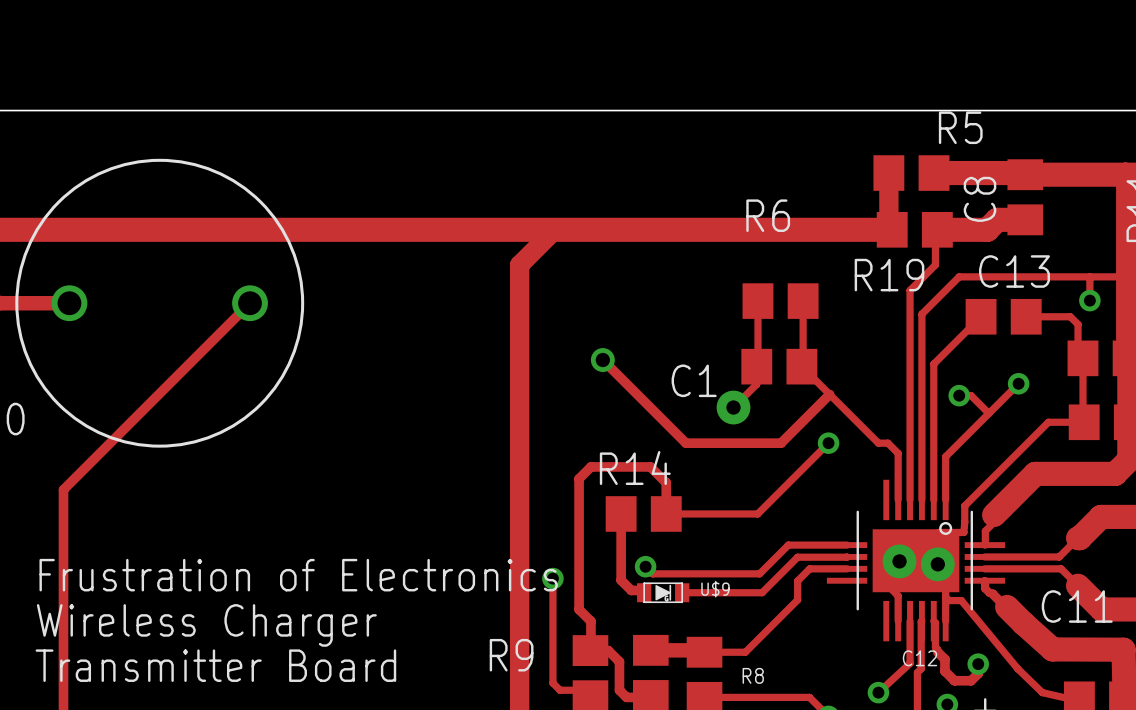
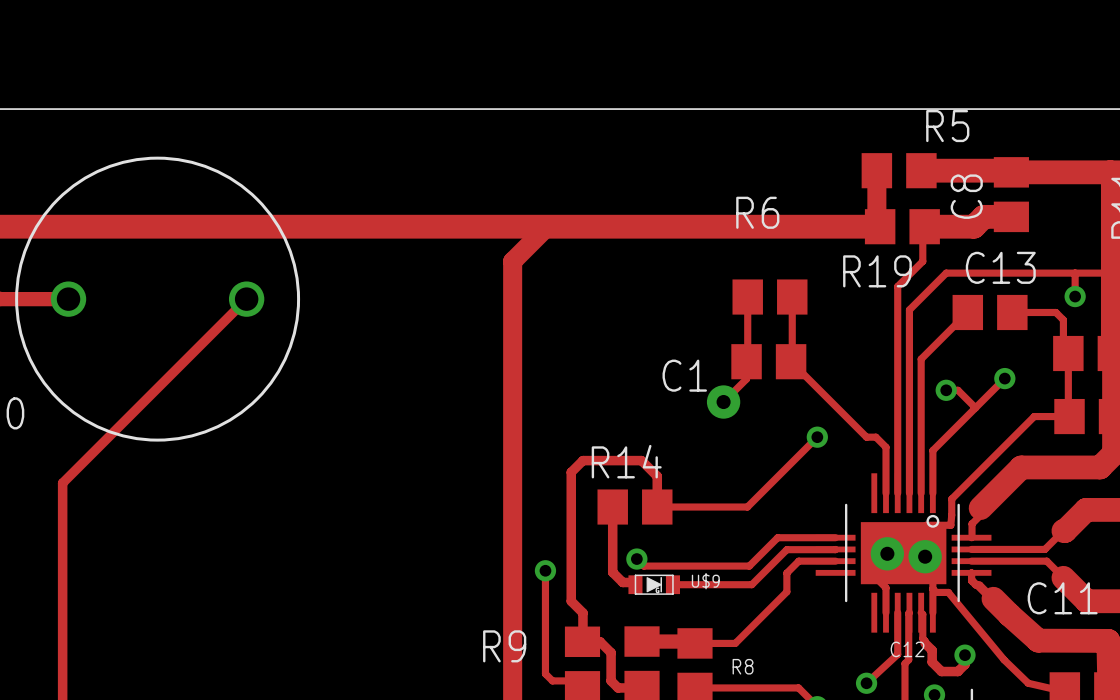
track: (602, 360) (685, 443) (781, 443) (829, 394) -> none
via: (602, 360) -> none
text: Frustration of Electronics (298, 575) -> none
text: Wireless Charger (206, 625) -> none
text: Transmitter Board (215, 665) -> none

